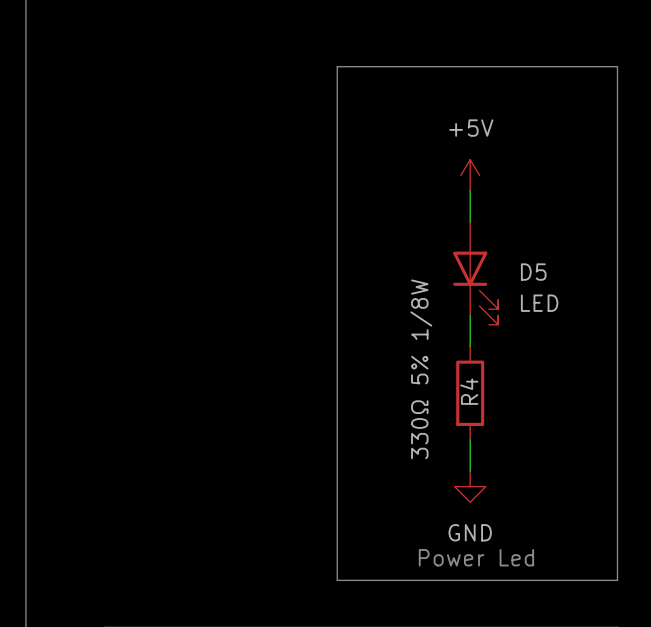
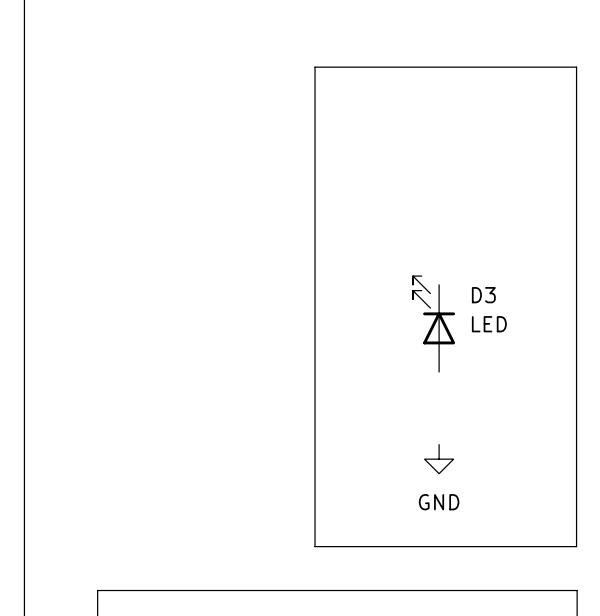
power symbol: +5V (470, 175) -> none
wire: (470, 190) (470, 222) -> none
D5: LED (475, 273) -> none
D3: none -> LED (434, 324)
R4: 330Ω 5% 1/8W (470, 393) -> none
wire: (470, 439) (470, 471) -> none
text: Power Led (476, 557) -> none

